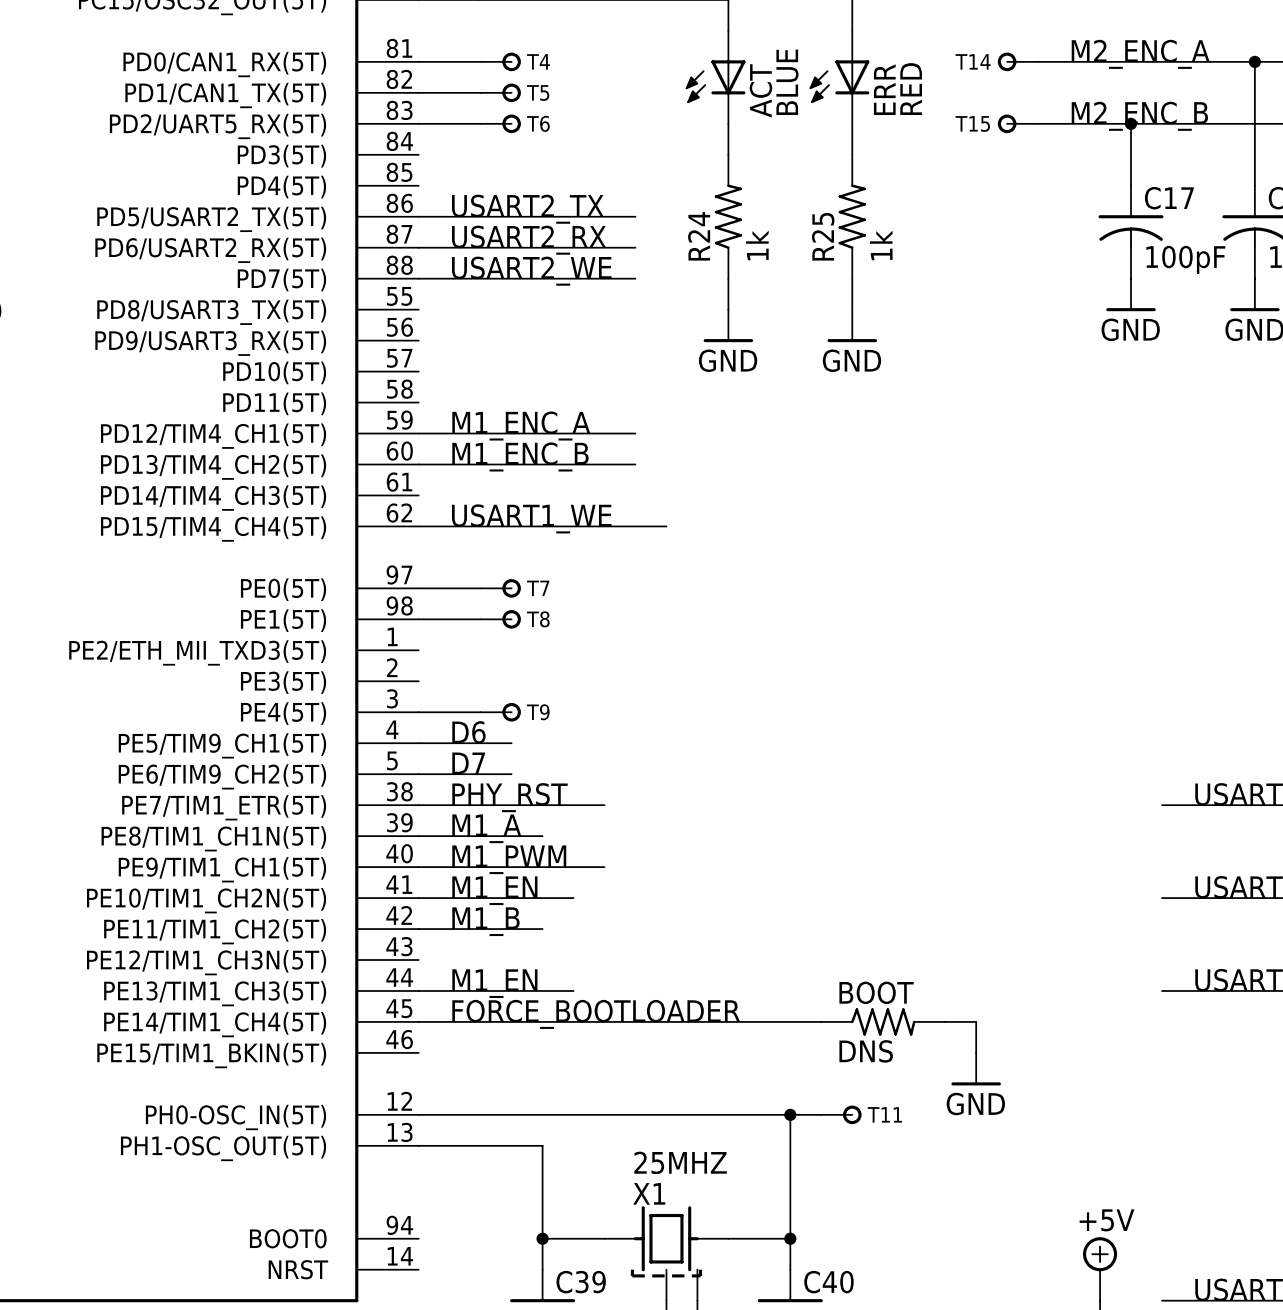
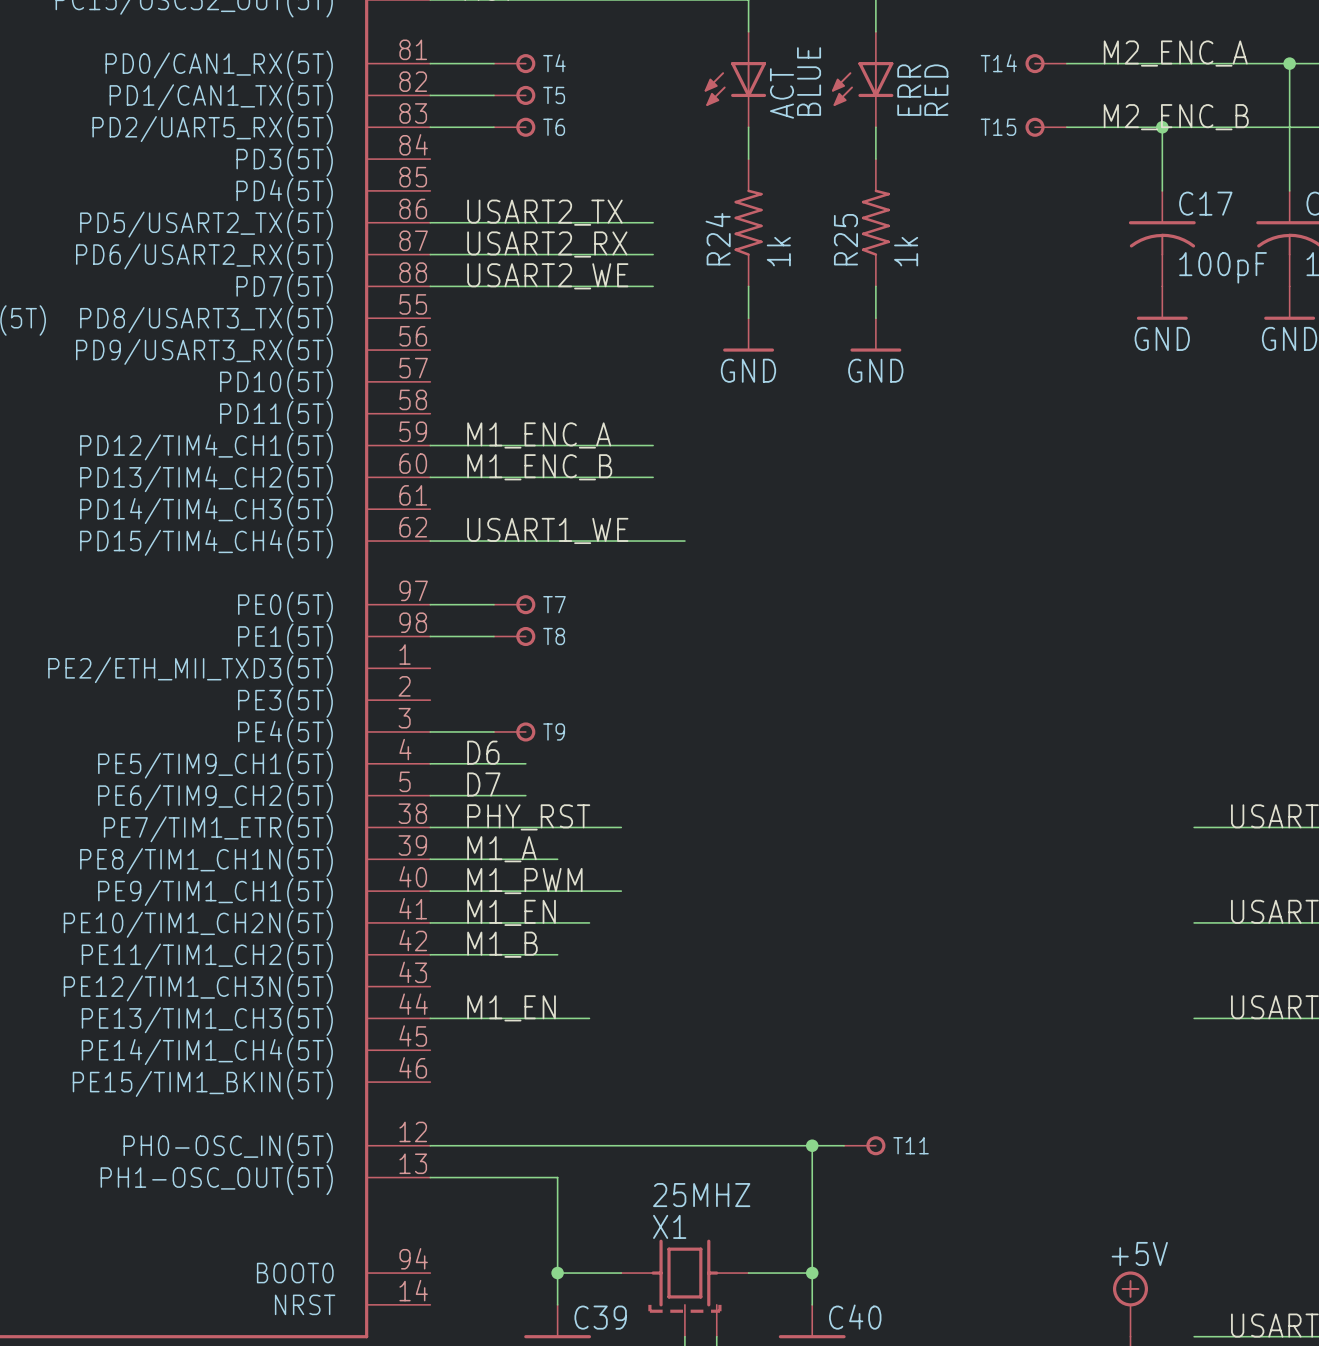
label: FORCE_BOOTLOADER (596, 1014) -> none
wire: (418, 1021) (821, 1021) -> none
BOOT: DNS (883, 1021) -> none
wire: (945, 1021) (976, 1021) (976, 1052) -> none
power symbol: GND (976, 1069) -> none

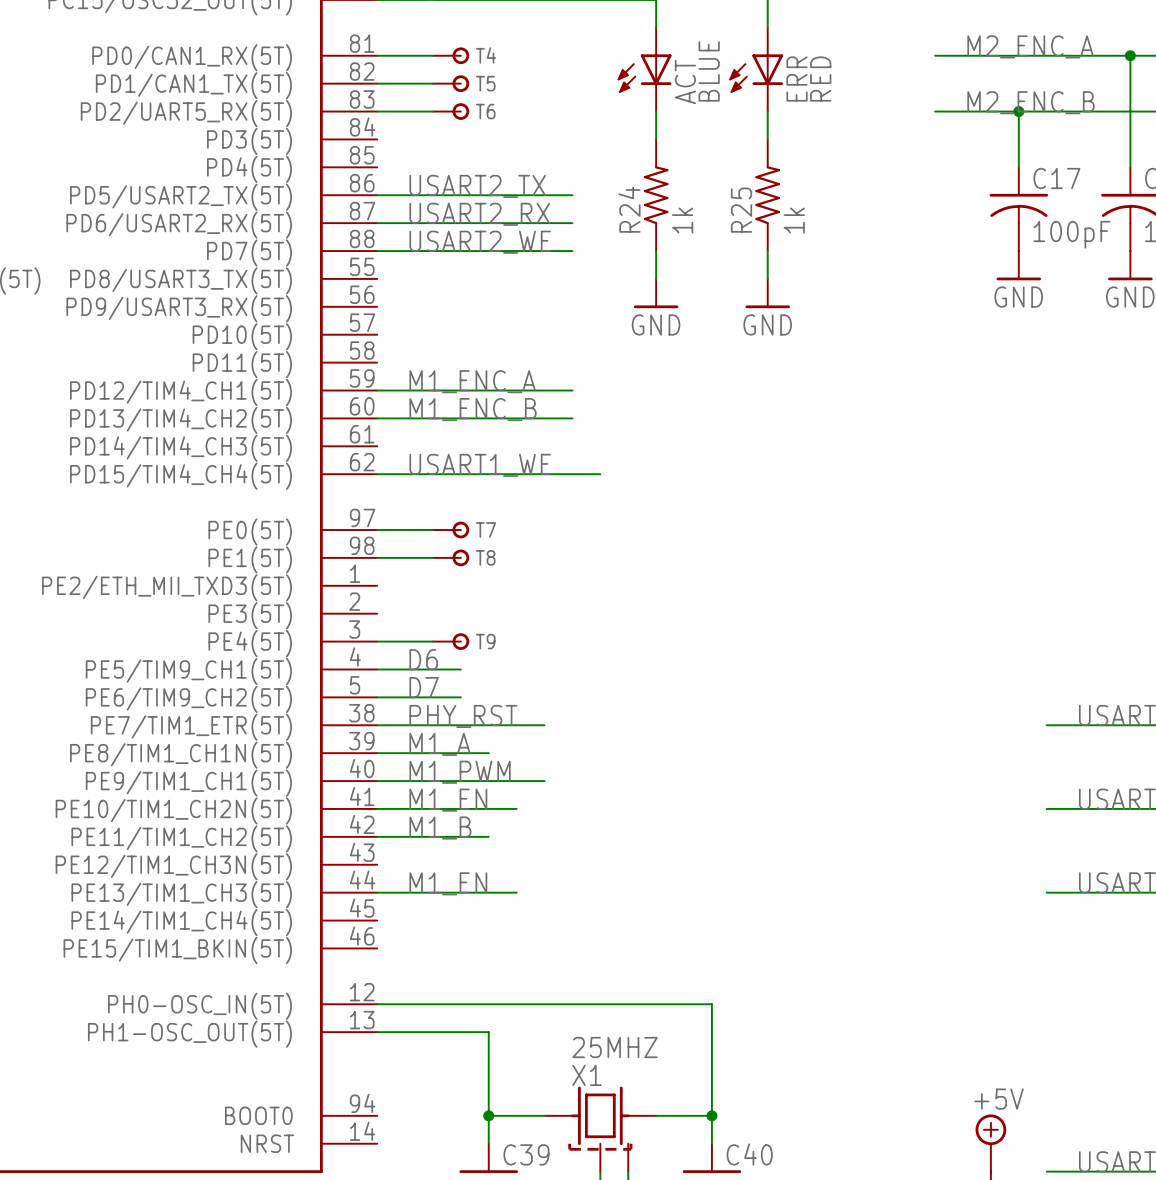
T14: (1046, 63) -> none
T15: (1046, 127) -> none
wire: (812, 1145) (844, 1145) -> none
junction: (812, 1145) -> none
T11: (864, 1145) -> none

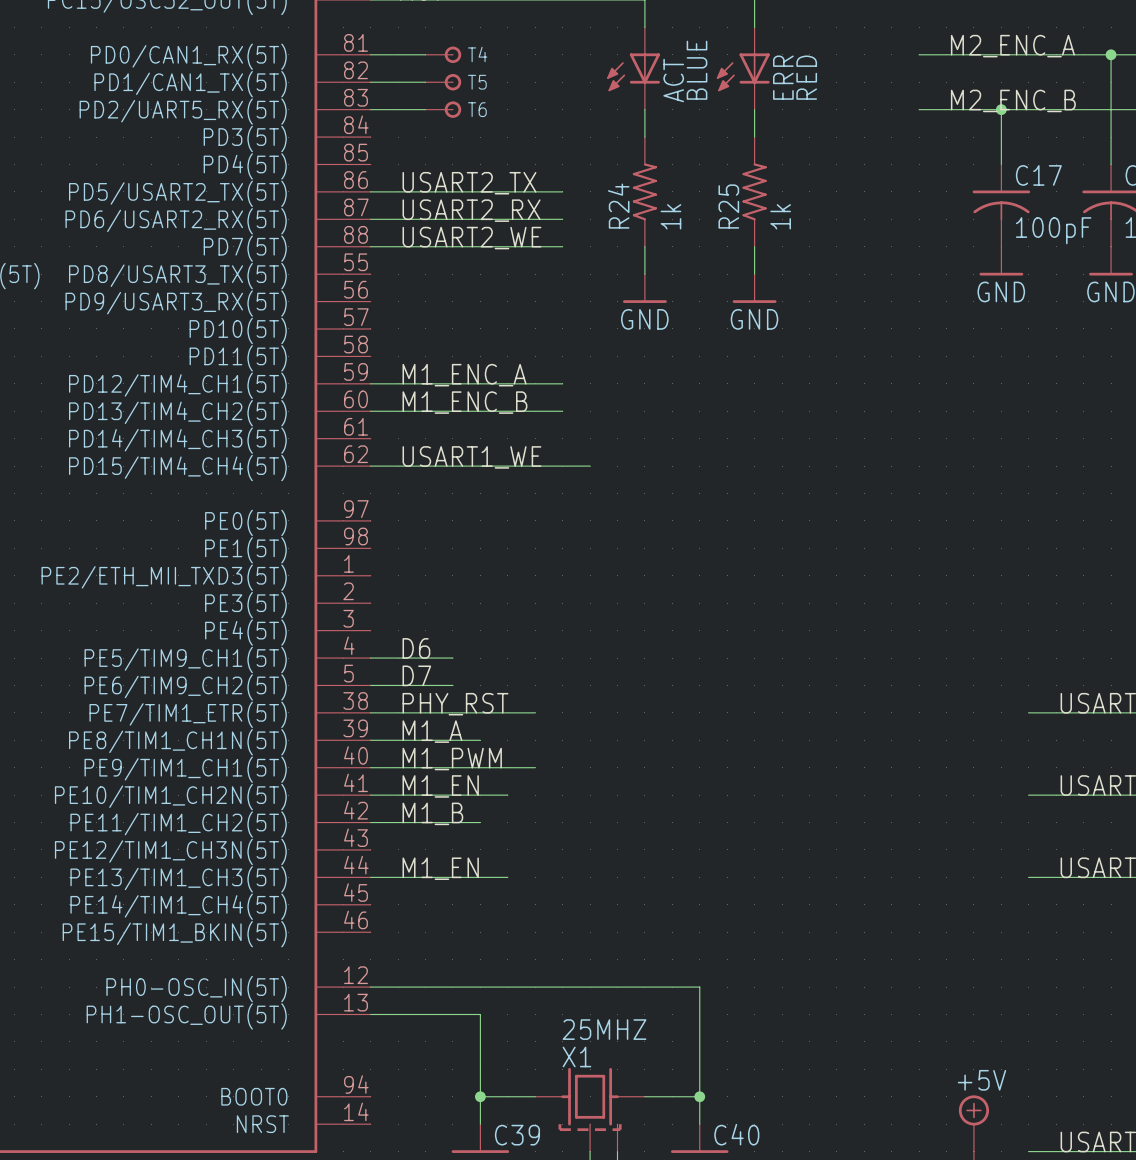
wire: (377, 530) (432, 530) -> none
T7: (451, 530) -> none
wire: (377, 557) (432, 557) -> none
T8: (451, 557) -> none
wire: (377, 641) (432, 641) -> none
T9: (451, 641) -> none

